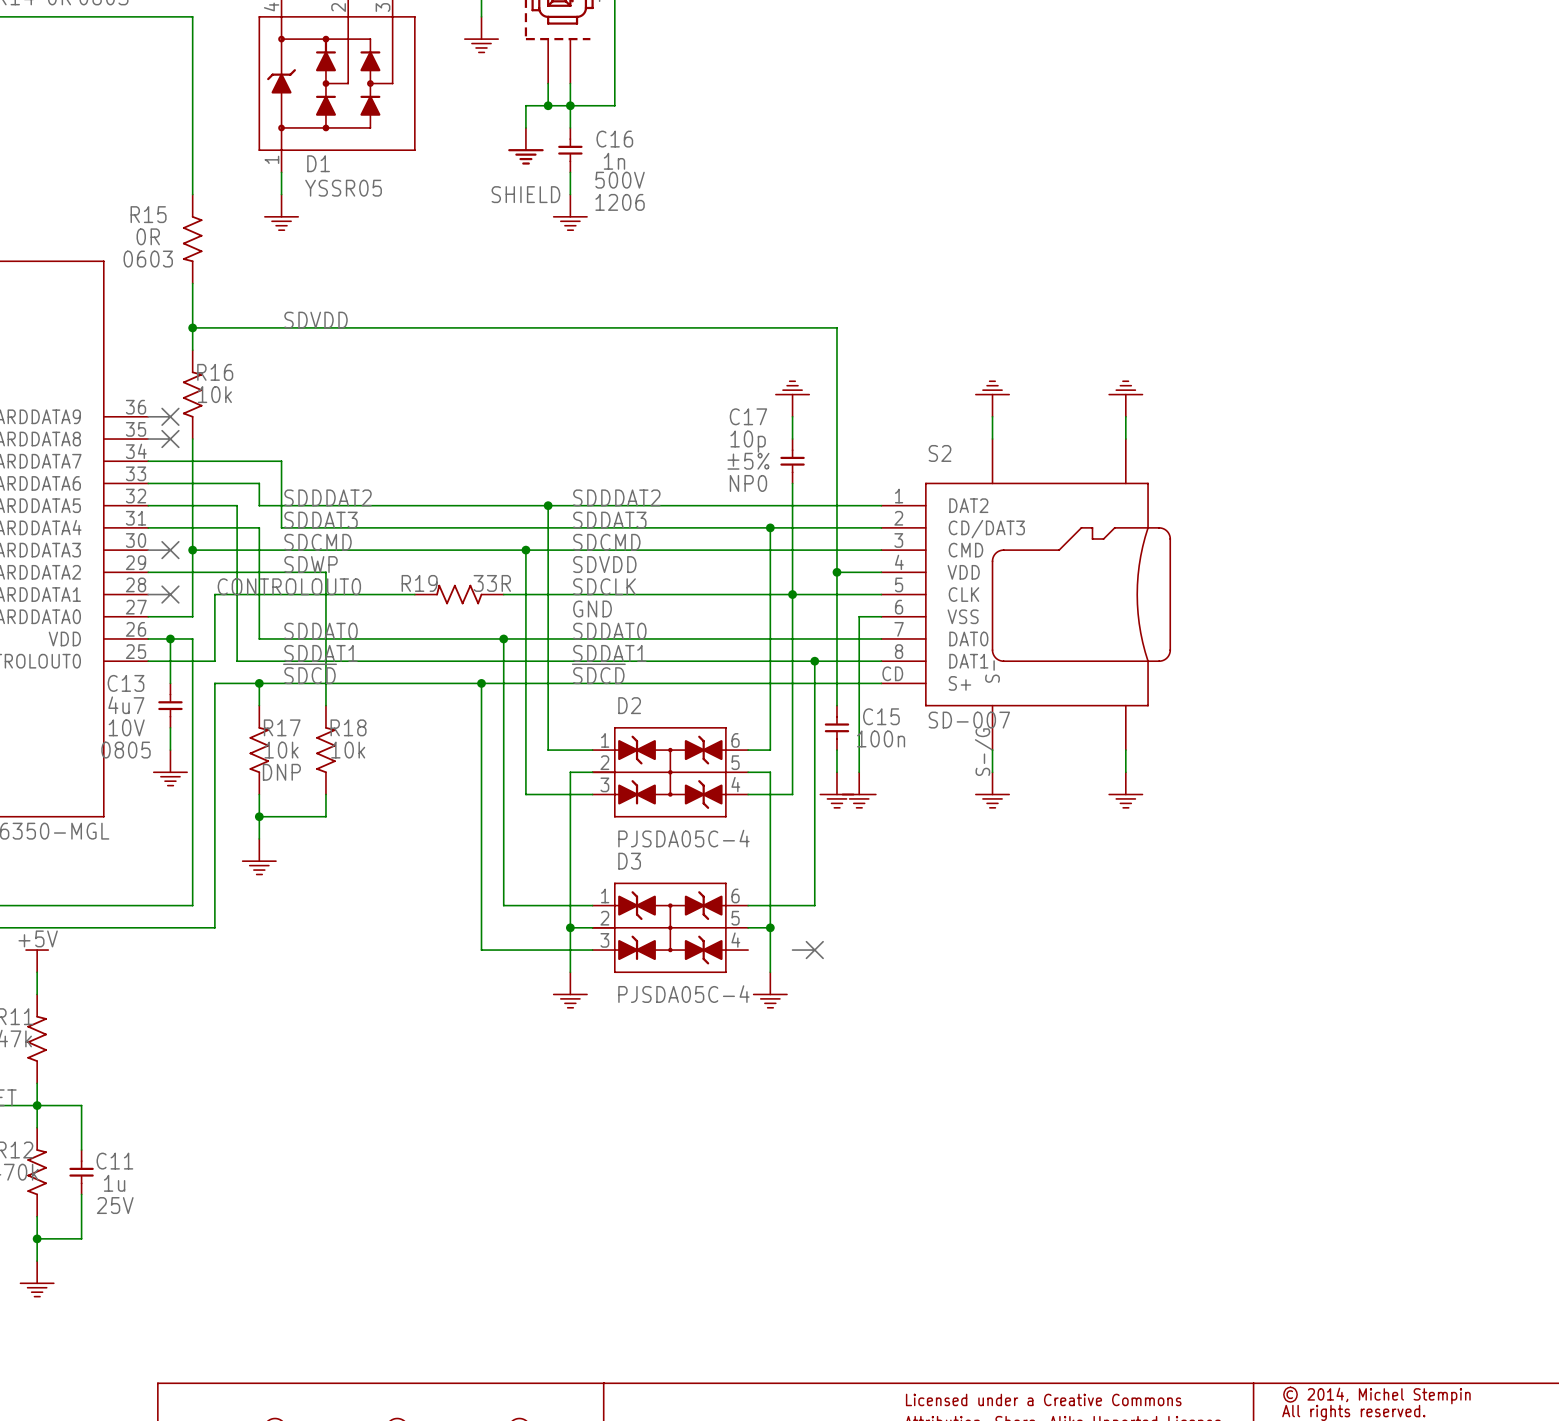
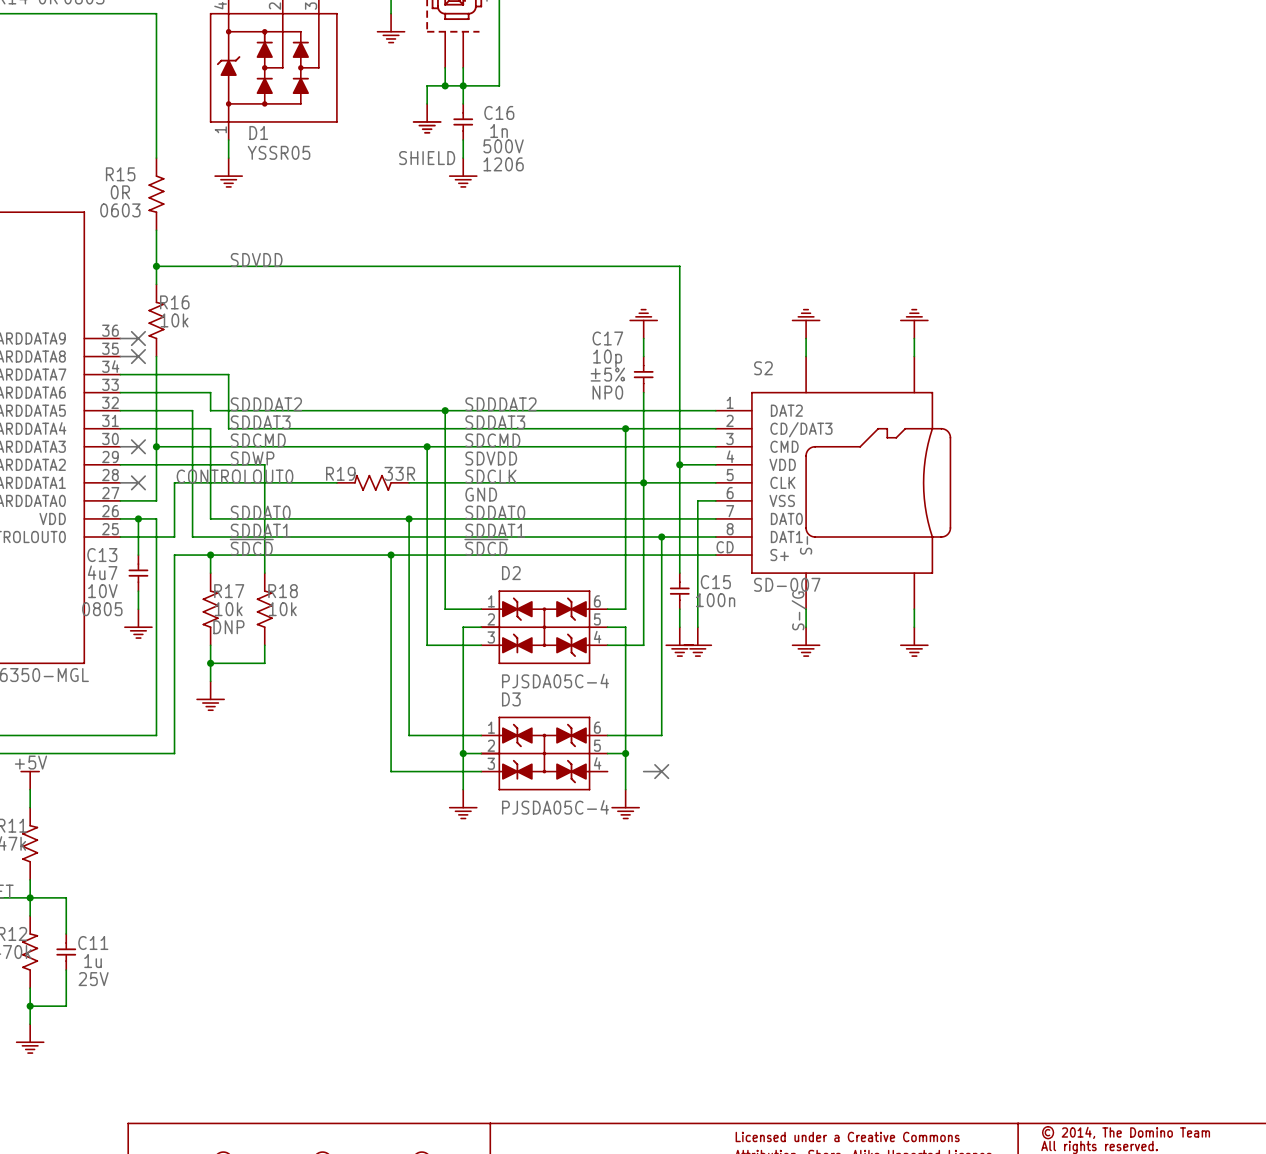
text: © 2014, Michel Stempin (1376, 1395) -> © 2014, The Domino Team (1126, 1132)

